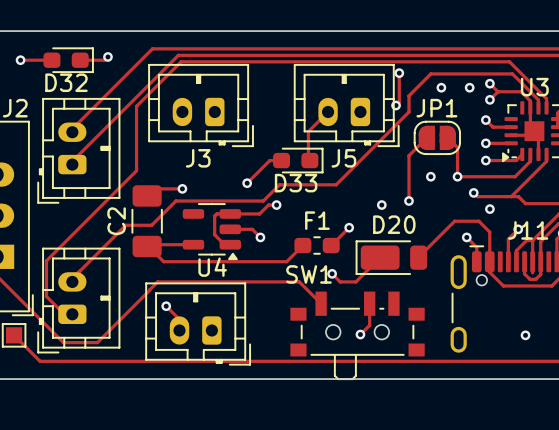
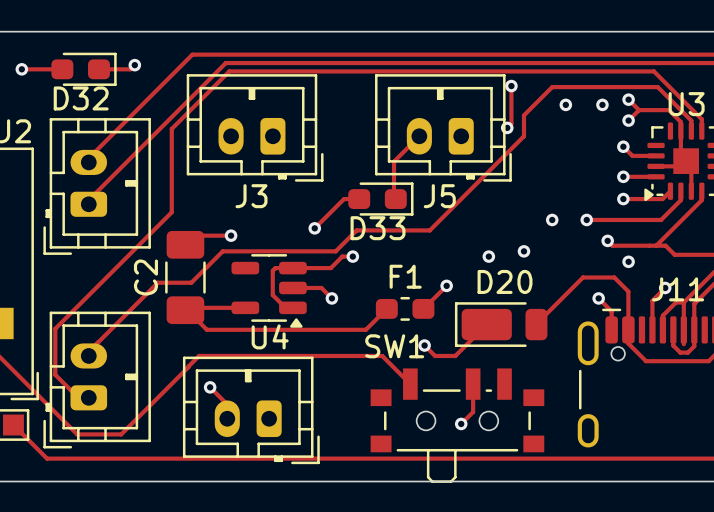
track: (426, 137) (408, 155) (408, 201) -> none
JP1: (437, 137) -> none
track: (447, 137) (457, 147) (457, 176) -> none
via: (525, 335) -> none

